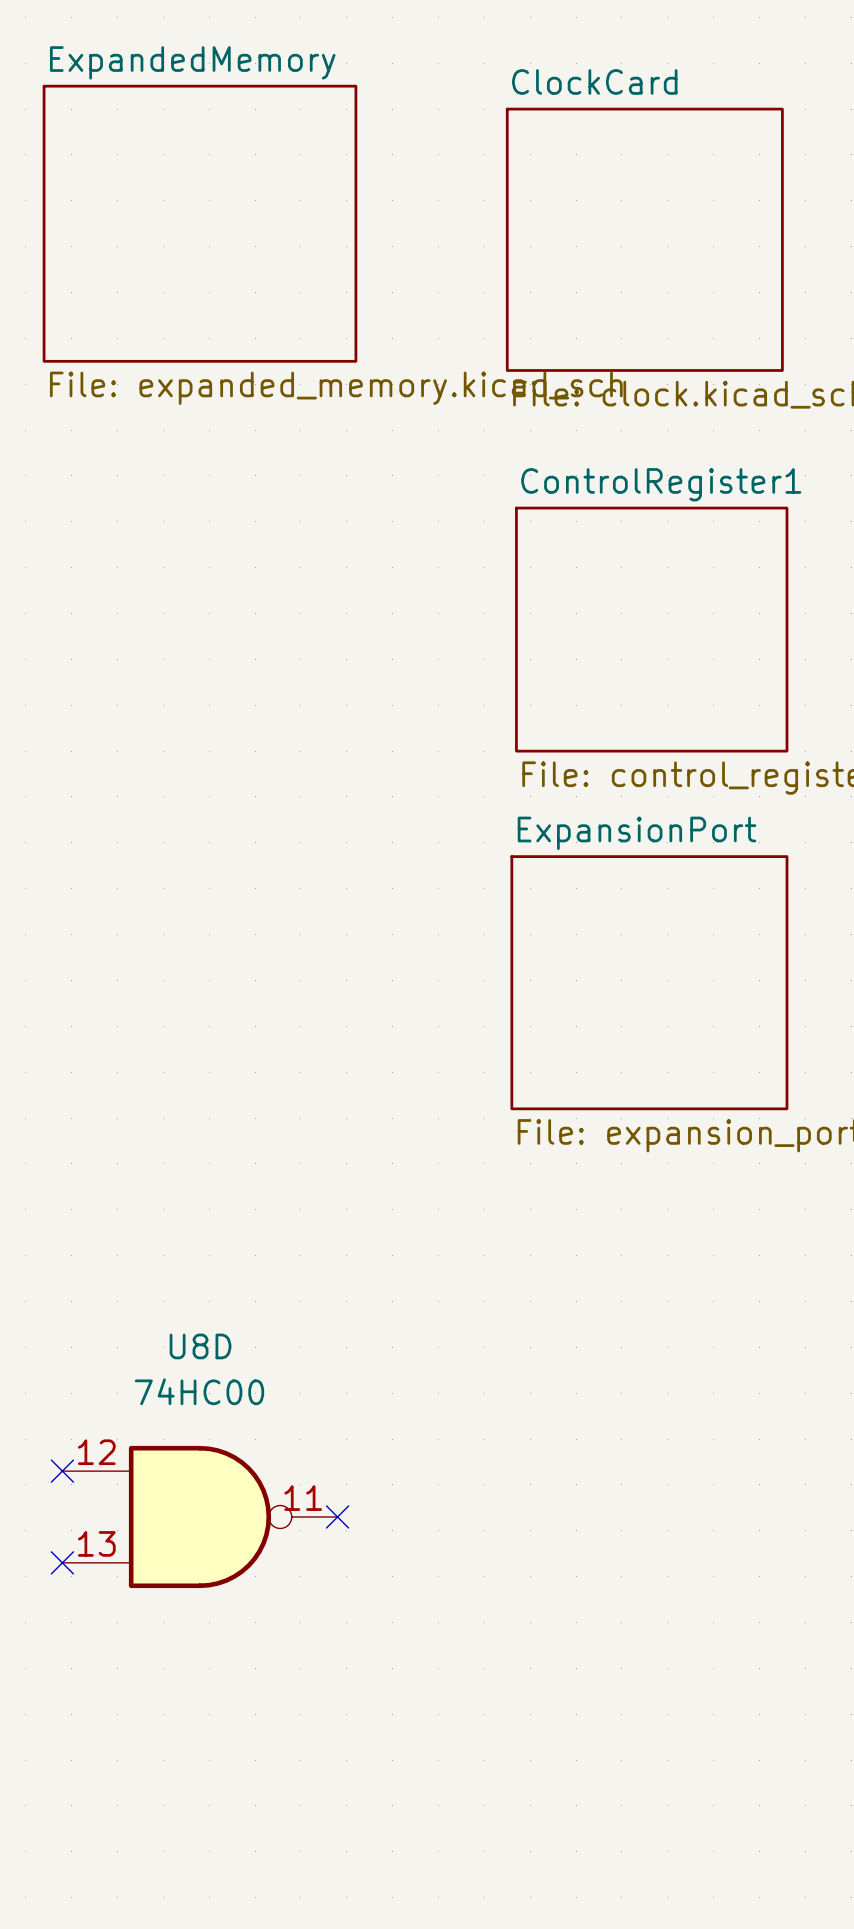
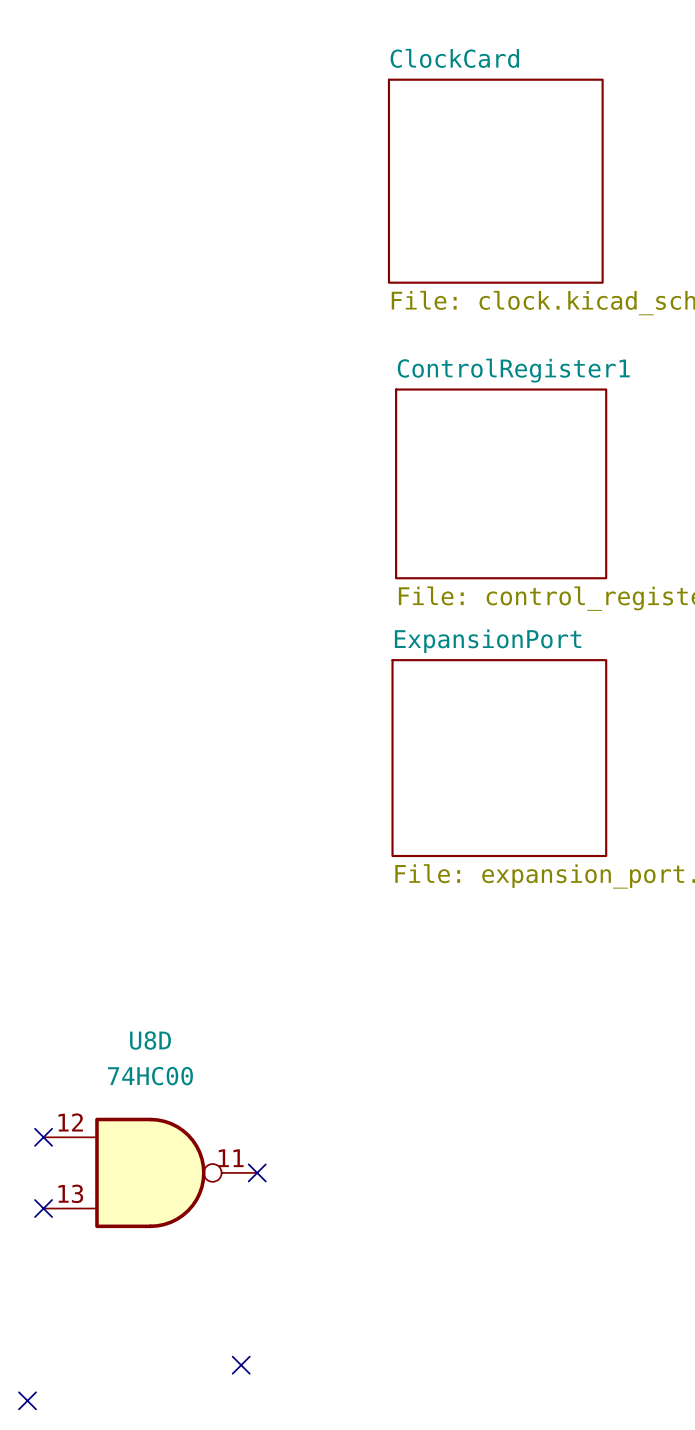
sheet ExpandedMemory: File: expanded_memory.kicad_sch (199, 223) -> none
no-connect mark: none -> (241, 1365)
no-connect mark: none -> (27, 1400)

